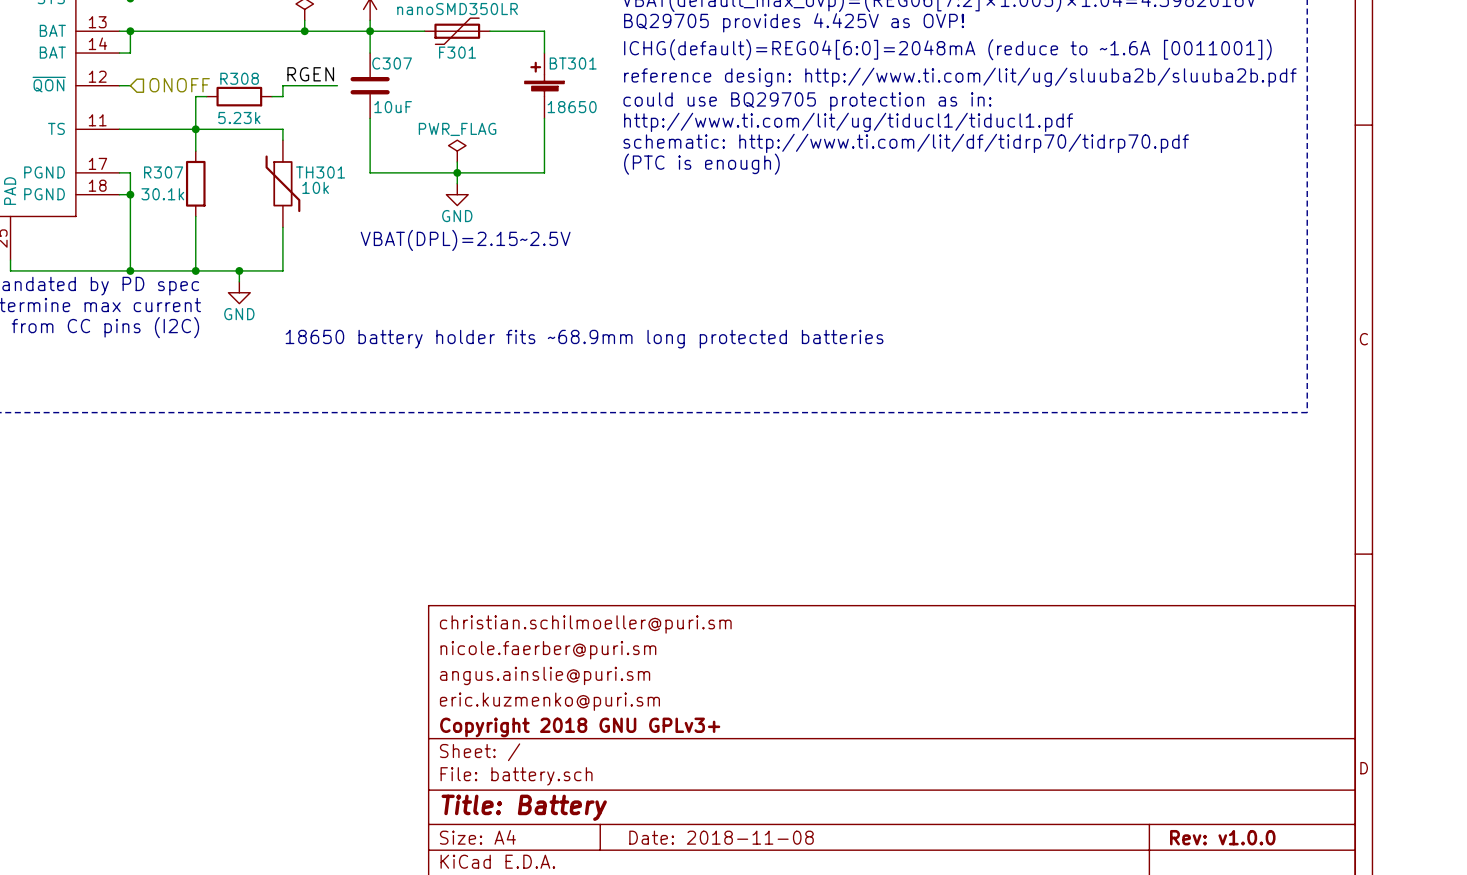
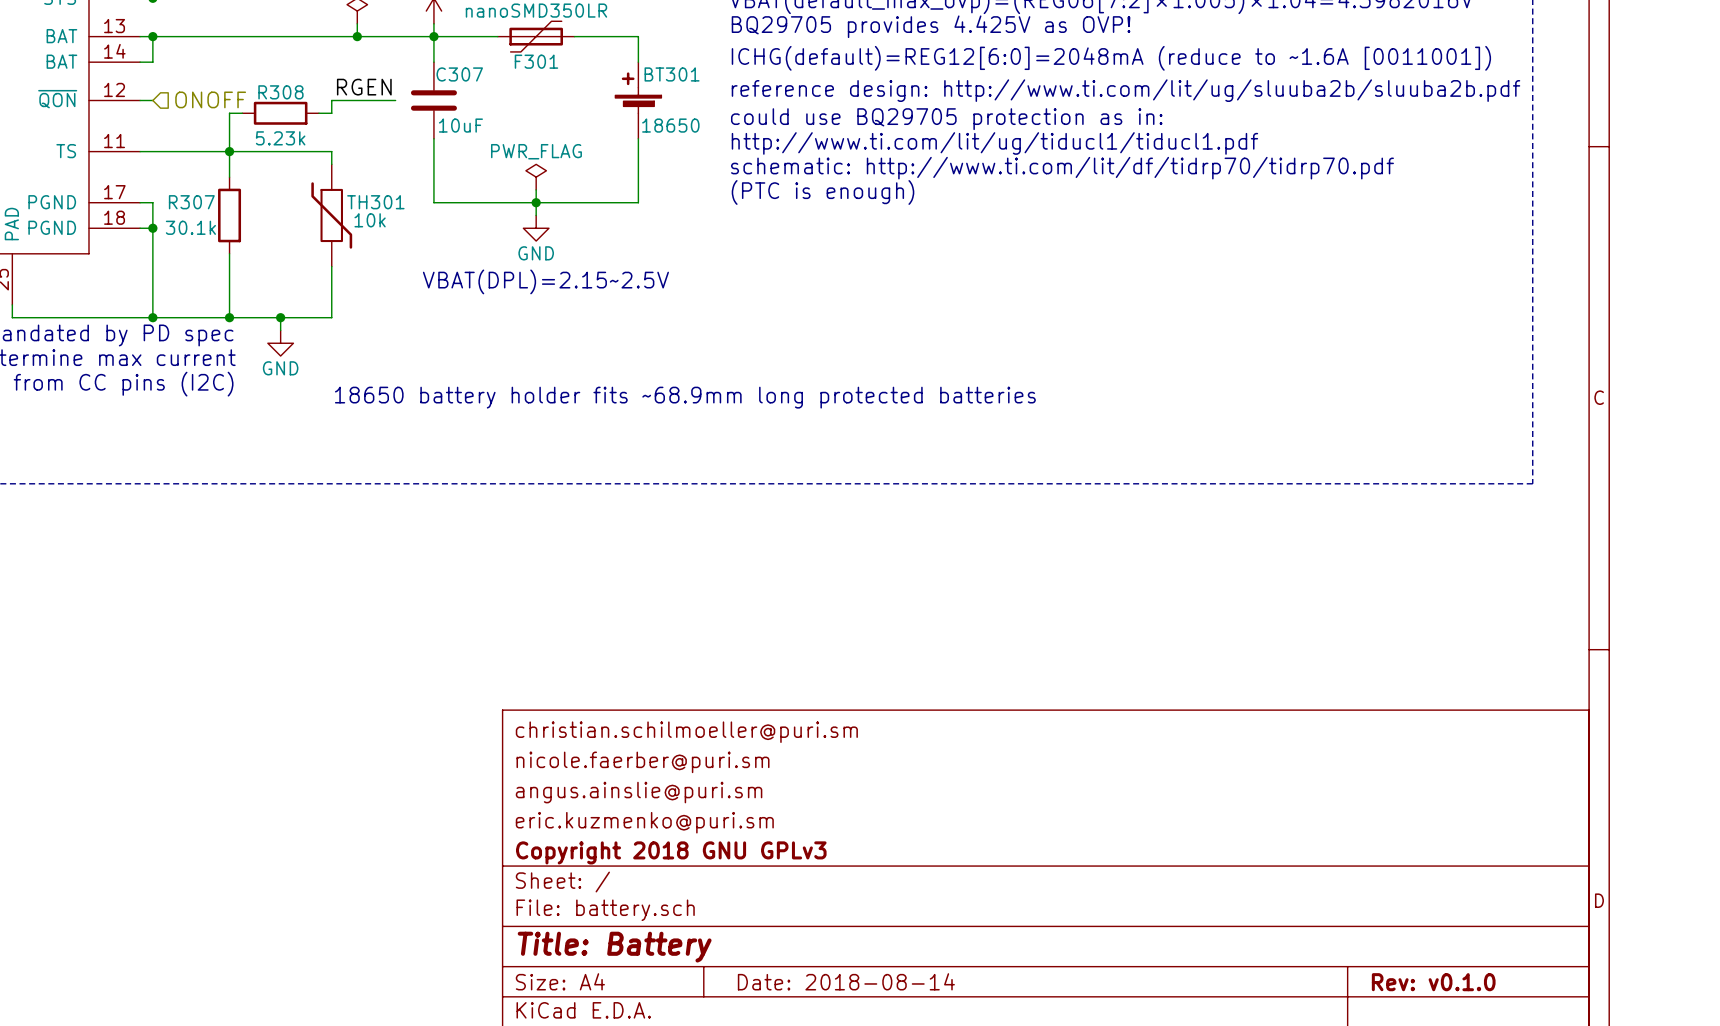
text: ICHG(default)=REG04[6:0]=2048mA (reduce to ~1.6A [0011001]) (947, 49) -> ICHG(default)=REG12[6:0]=2048mA (reduce to ~1.6A [0011001]) (1111, 58)
title block: Copyright 2018 GNU GPLv3+ (580, 727) -> Copyright 2018 GNU GPLv3 (671, 852)
title block: Date: 2018-11-08 (721, 837) -> Date: 2018-08-14 (846, 981)
title block: Rev: v1.0.0 (1222, 837) -> Rev: v0.1.0 (1433, 982)

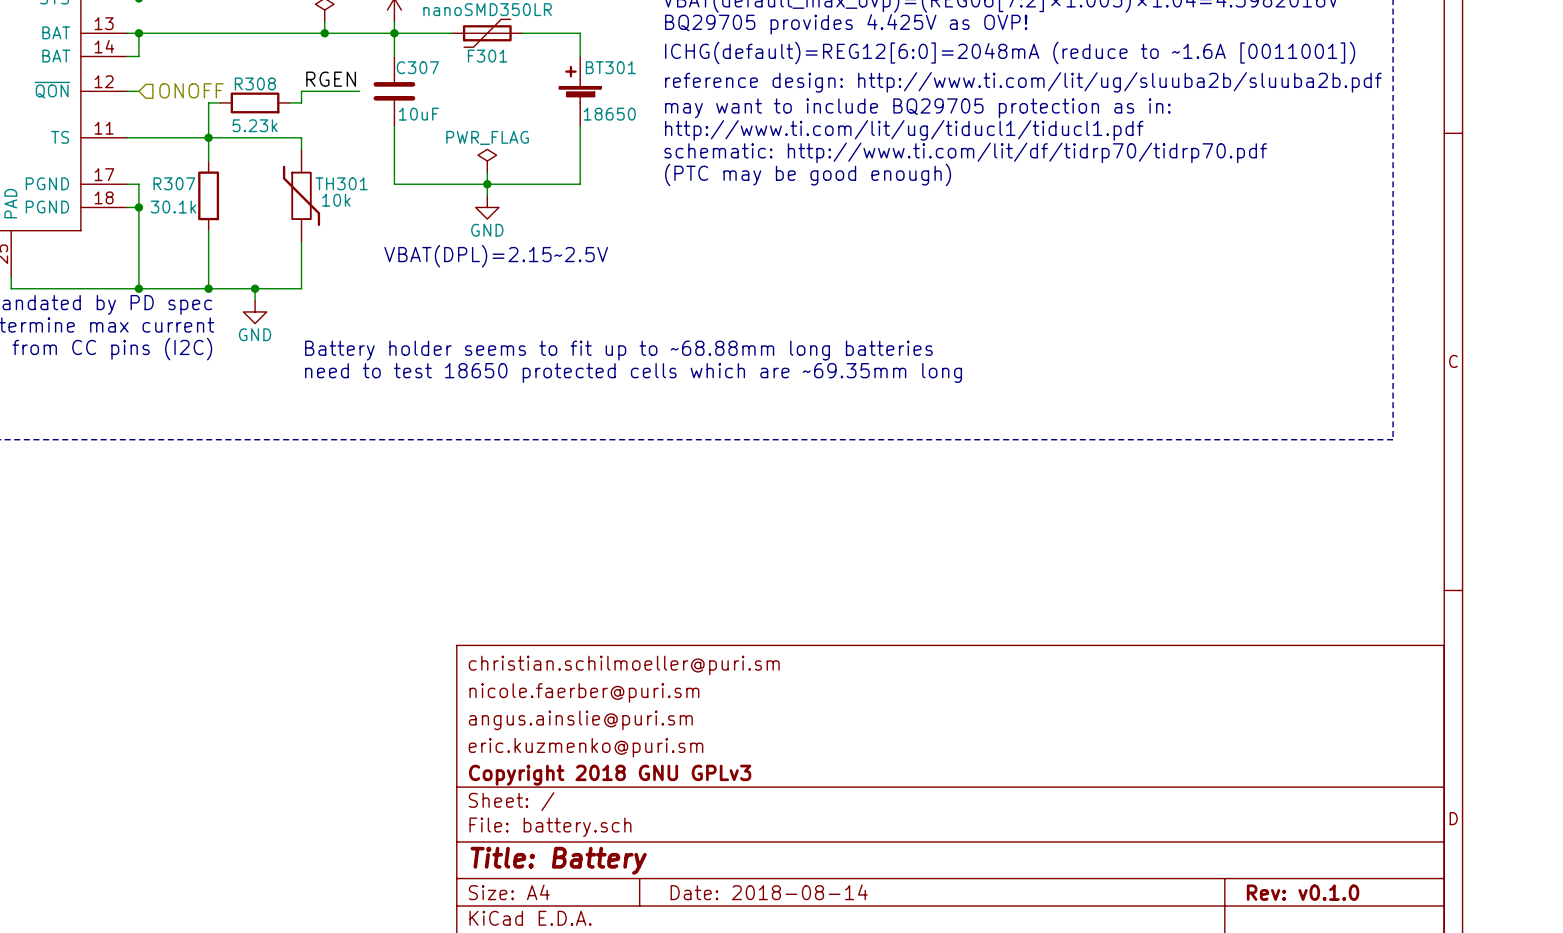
text: could use BQ29705 protection as in: (946, 119) -> may want to include BQ29705 protection as in: (917, 108)
text: (PTC is enough) (823, 192) -> (PTC may be good enough) (808, 174)
text: 18650 battery holder fits ~68.9mm long protected batteries (685, 397) -> Battery holder seems to fit up to ~68.88mm long batteries (618, 350)
text: none -> need to test 18650 protected cells which are ~69.35mm long (633, 373)

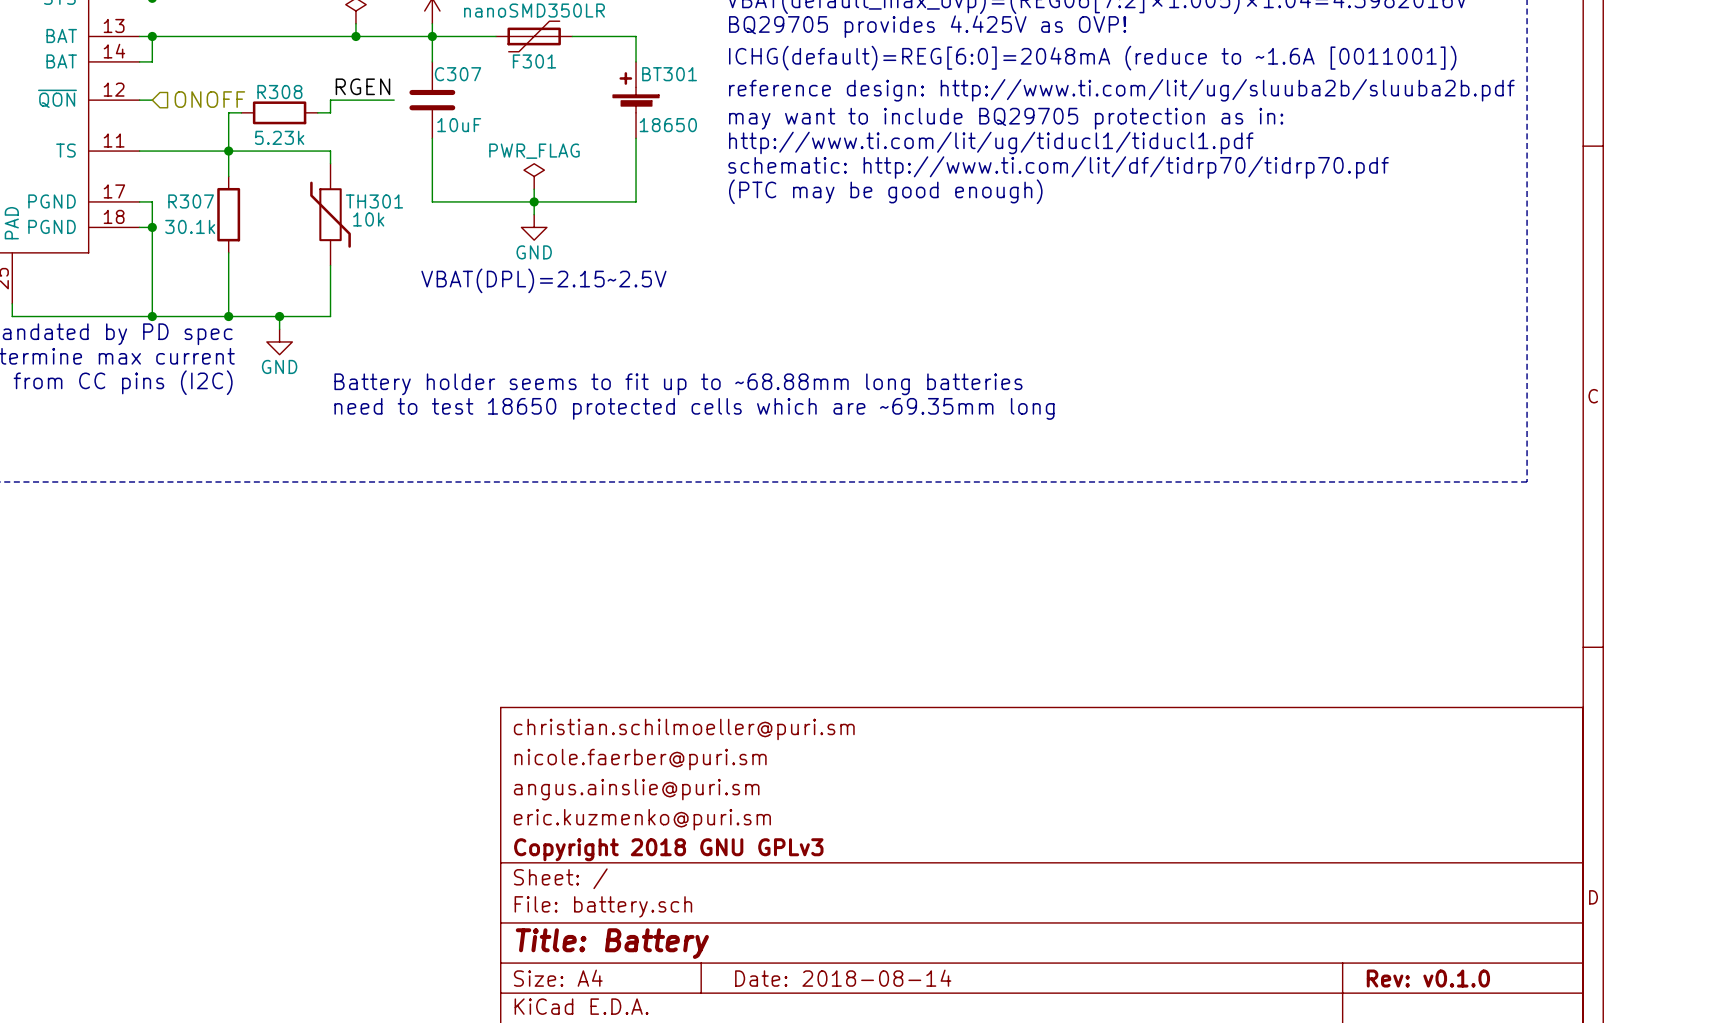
text: ICHG(default)=REG12[6:0]=2048mA (reduce to ~1.6A [0011001]) (1010, 53) -> ICHG(default)=REG[6:0]=2048mA (reduce to ~1.6A [0011001]) (1092, 58)

